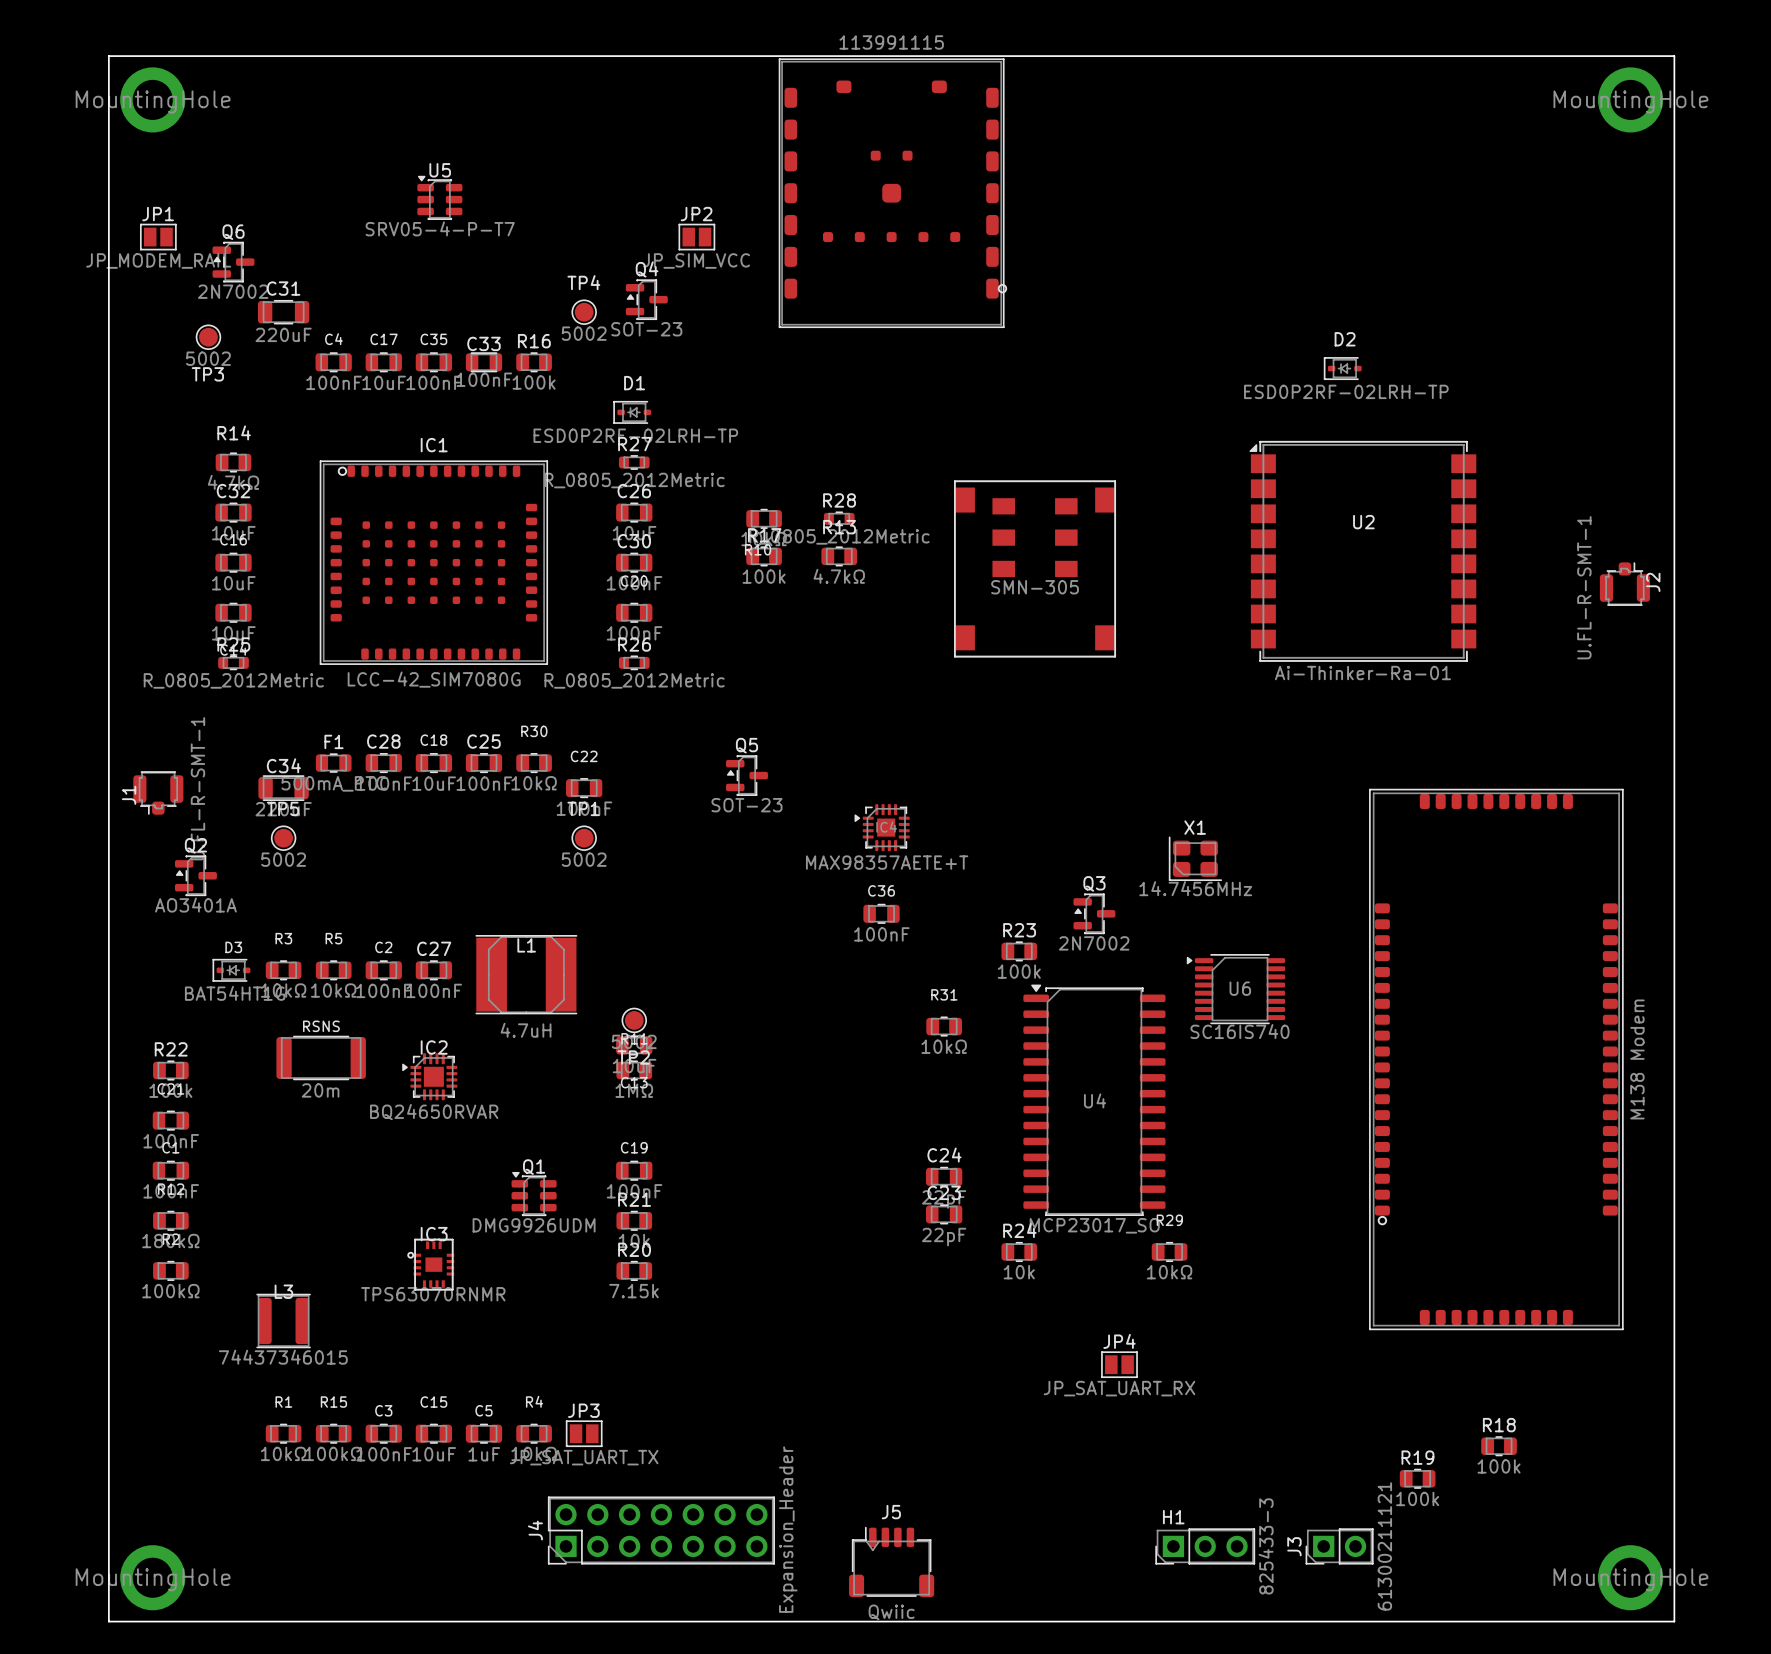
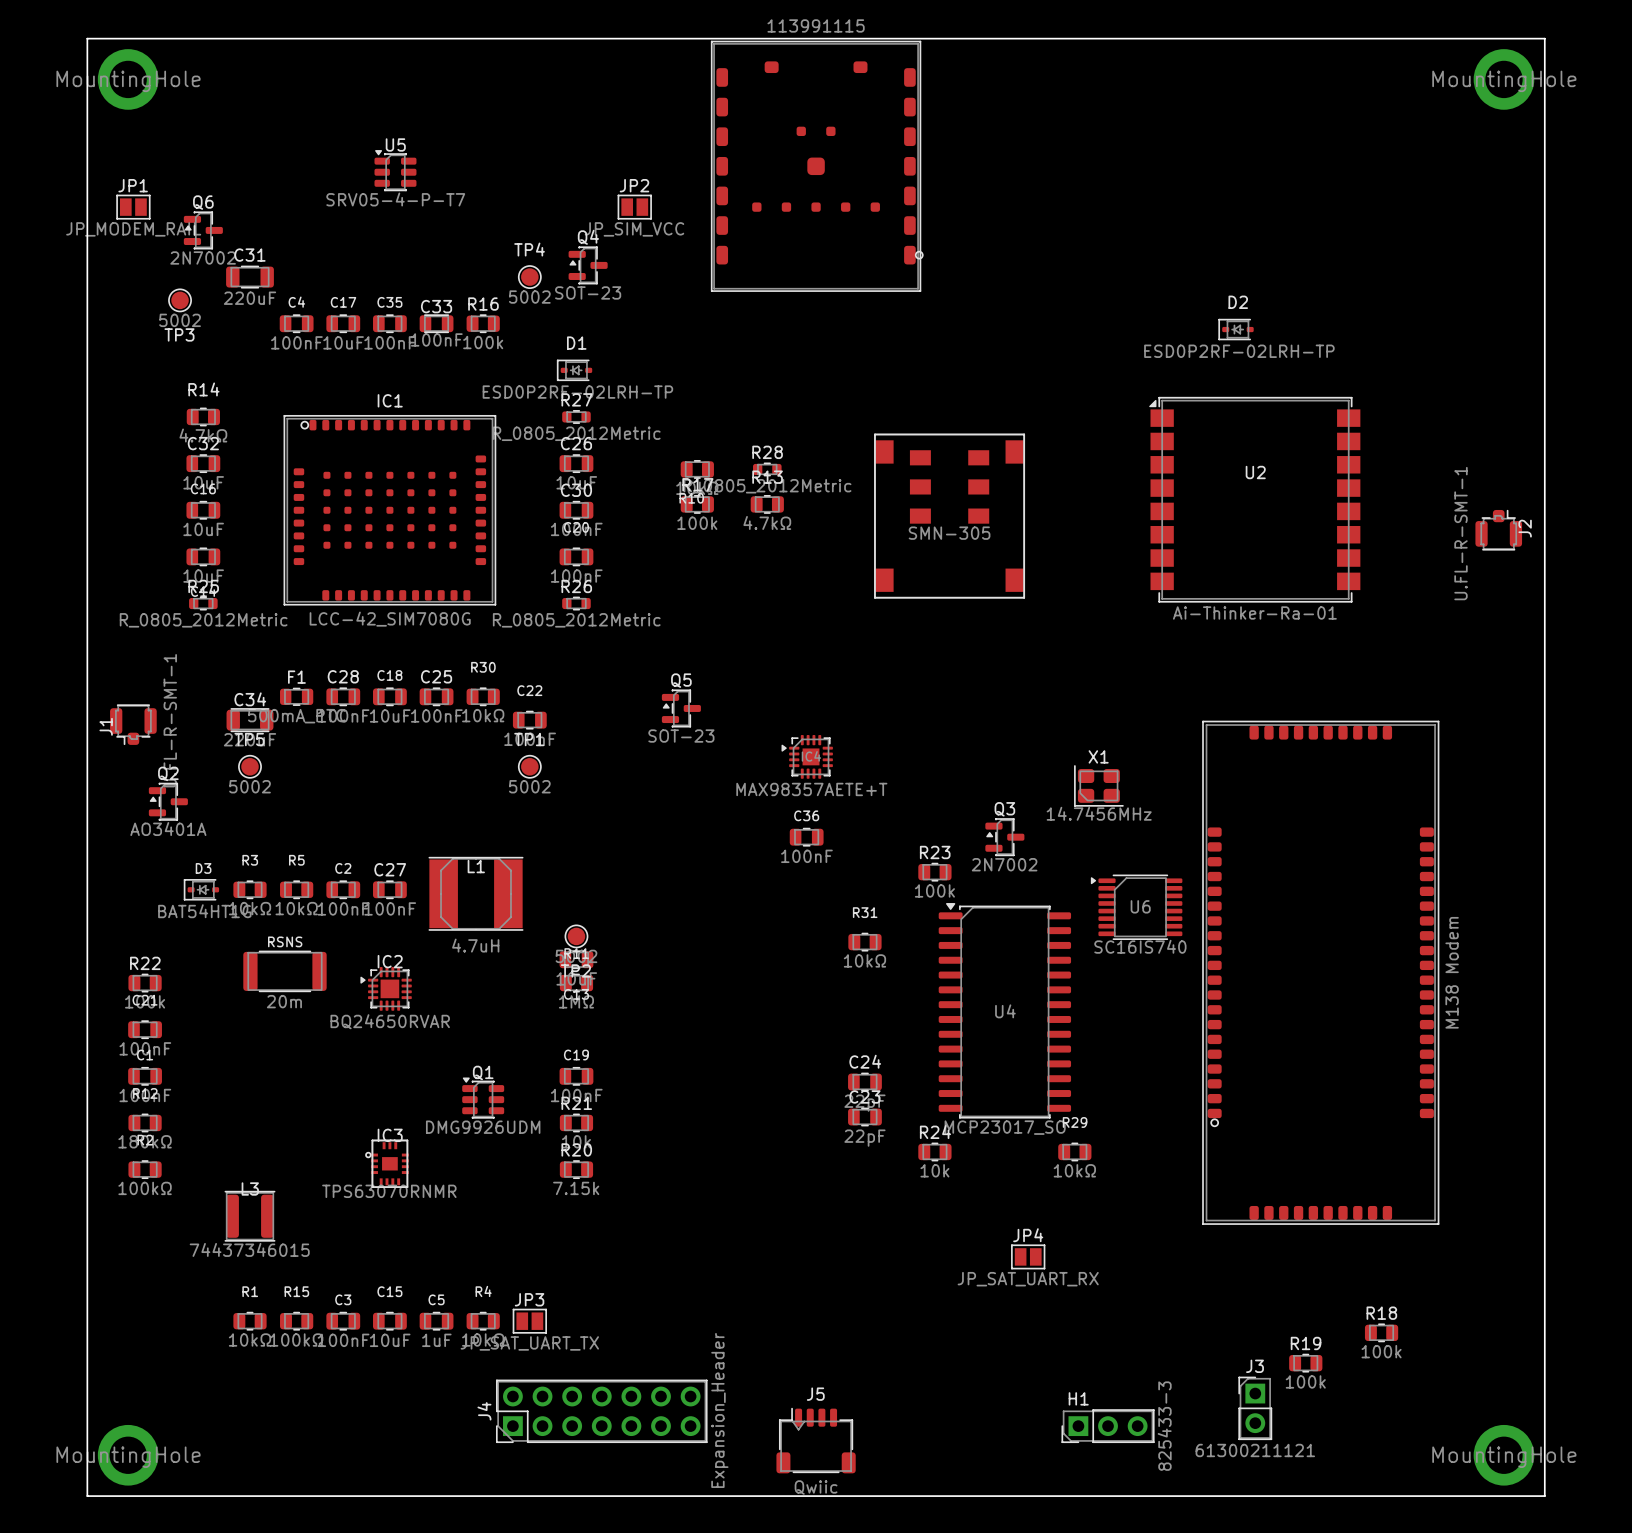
part position: (1496, 1059) -> (1320, 972)
J3 rotation: 0° (1339, 1546) -> 90° clockwise (1255, 1408)

